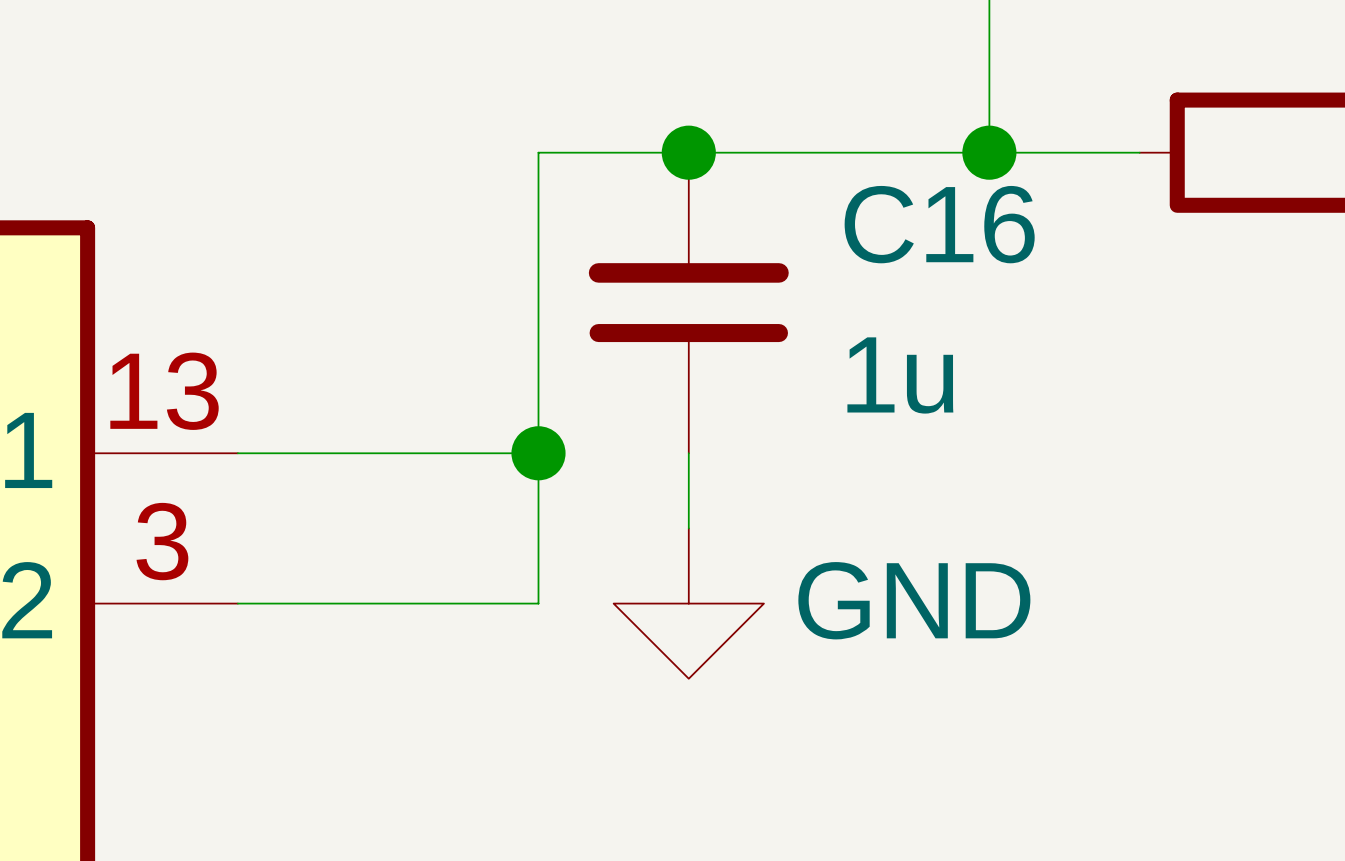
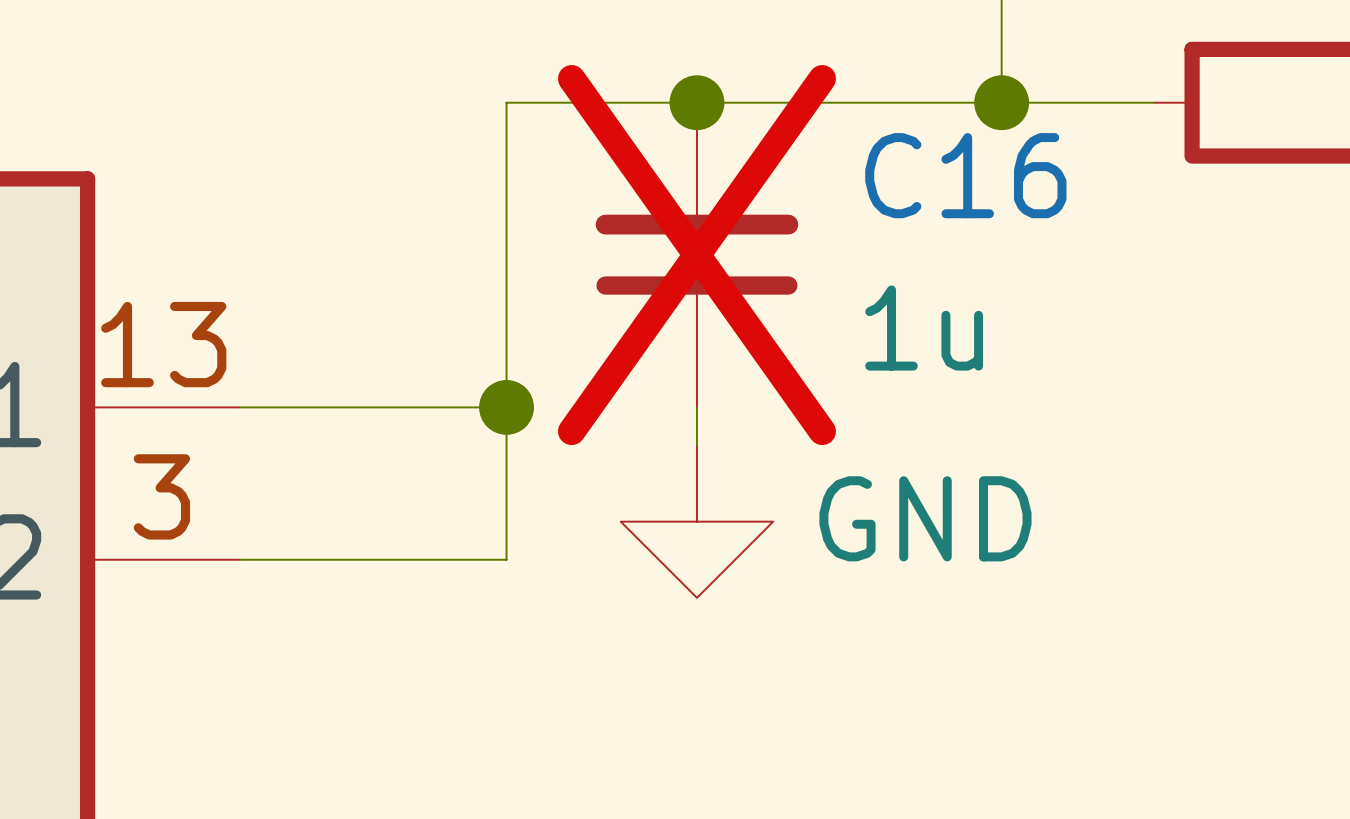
wire: (538, 152) (538, 603) (500, 603) -> (544, 102) (506, 102) (506, 559)
C16 do-not-place cross: none -> (696, 255)
junction position: (538, 453) -> (506, 407)
power symbol position: GND (688, 603) -> GND (696, 521)

